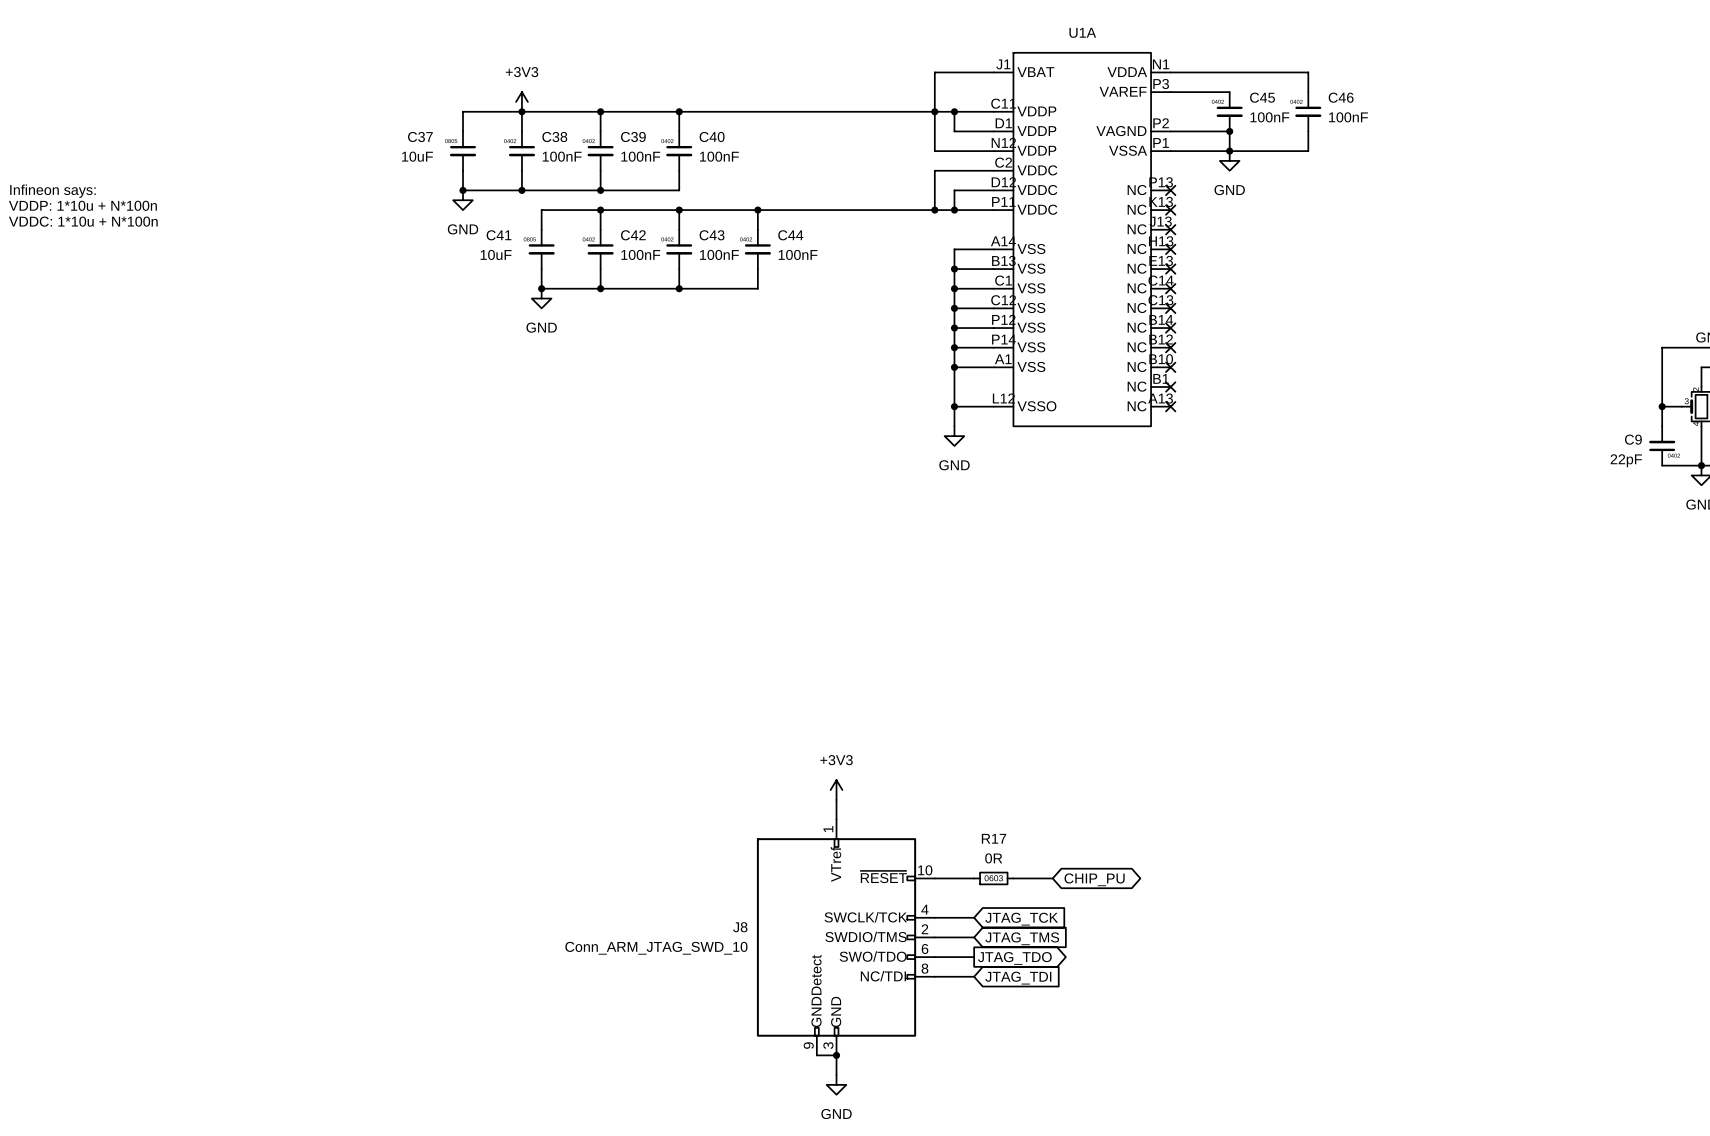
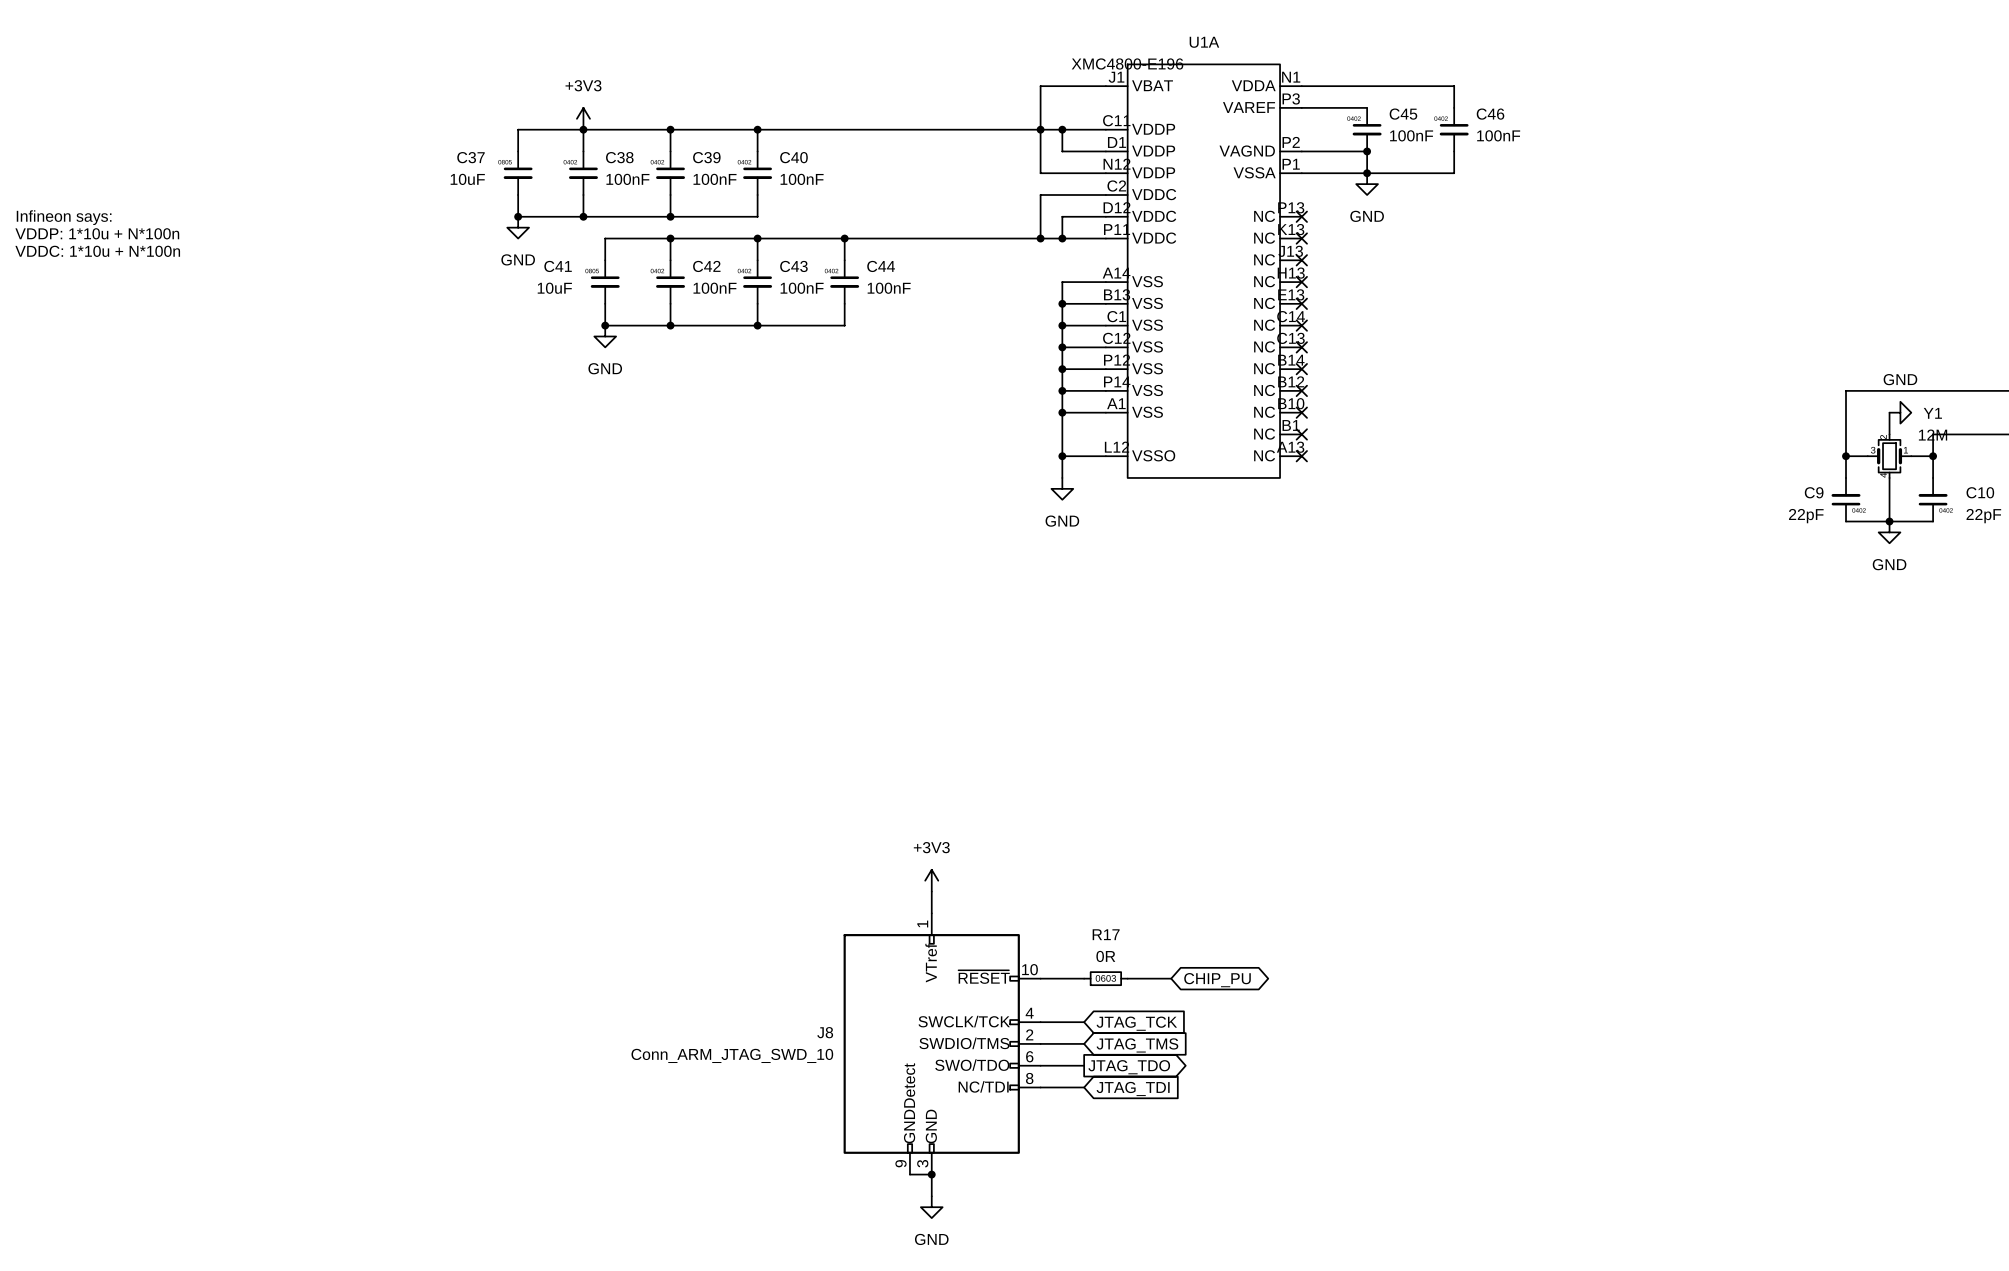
U1A value: none -> XMC4800-E196 (1127, 63)

